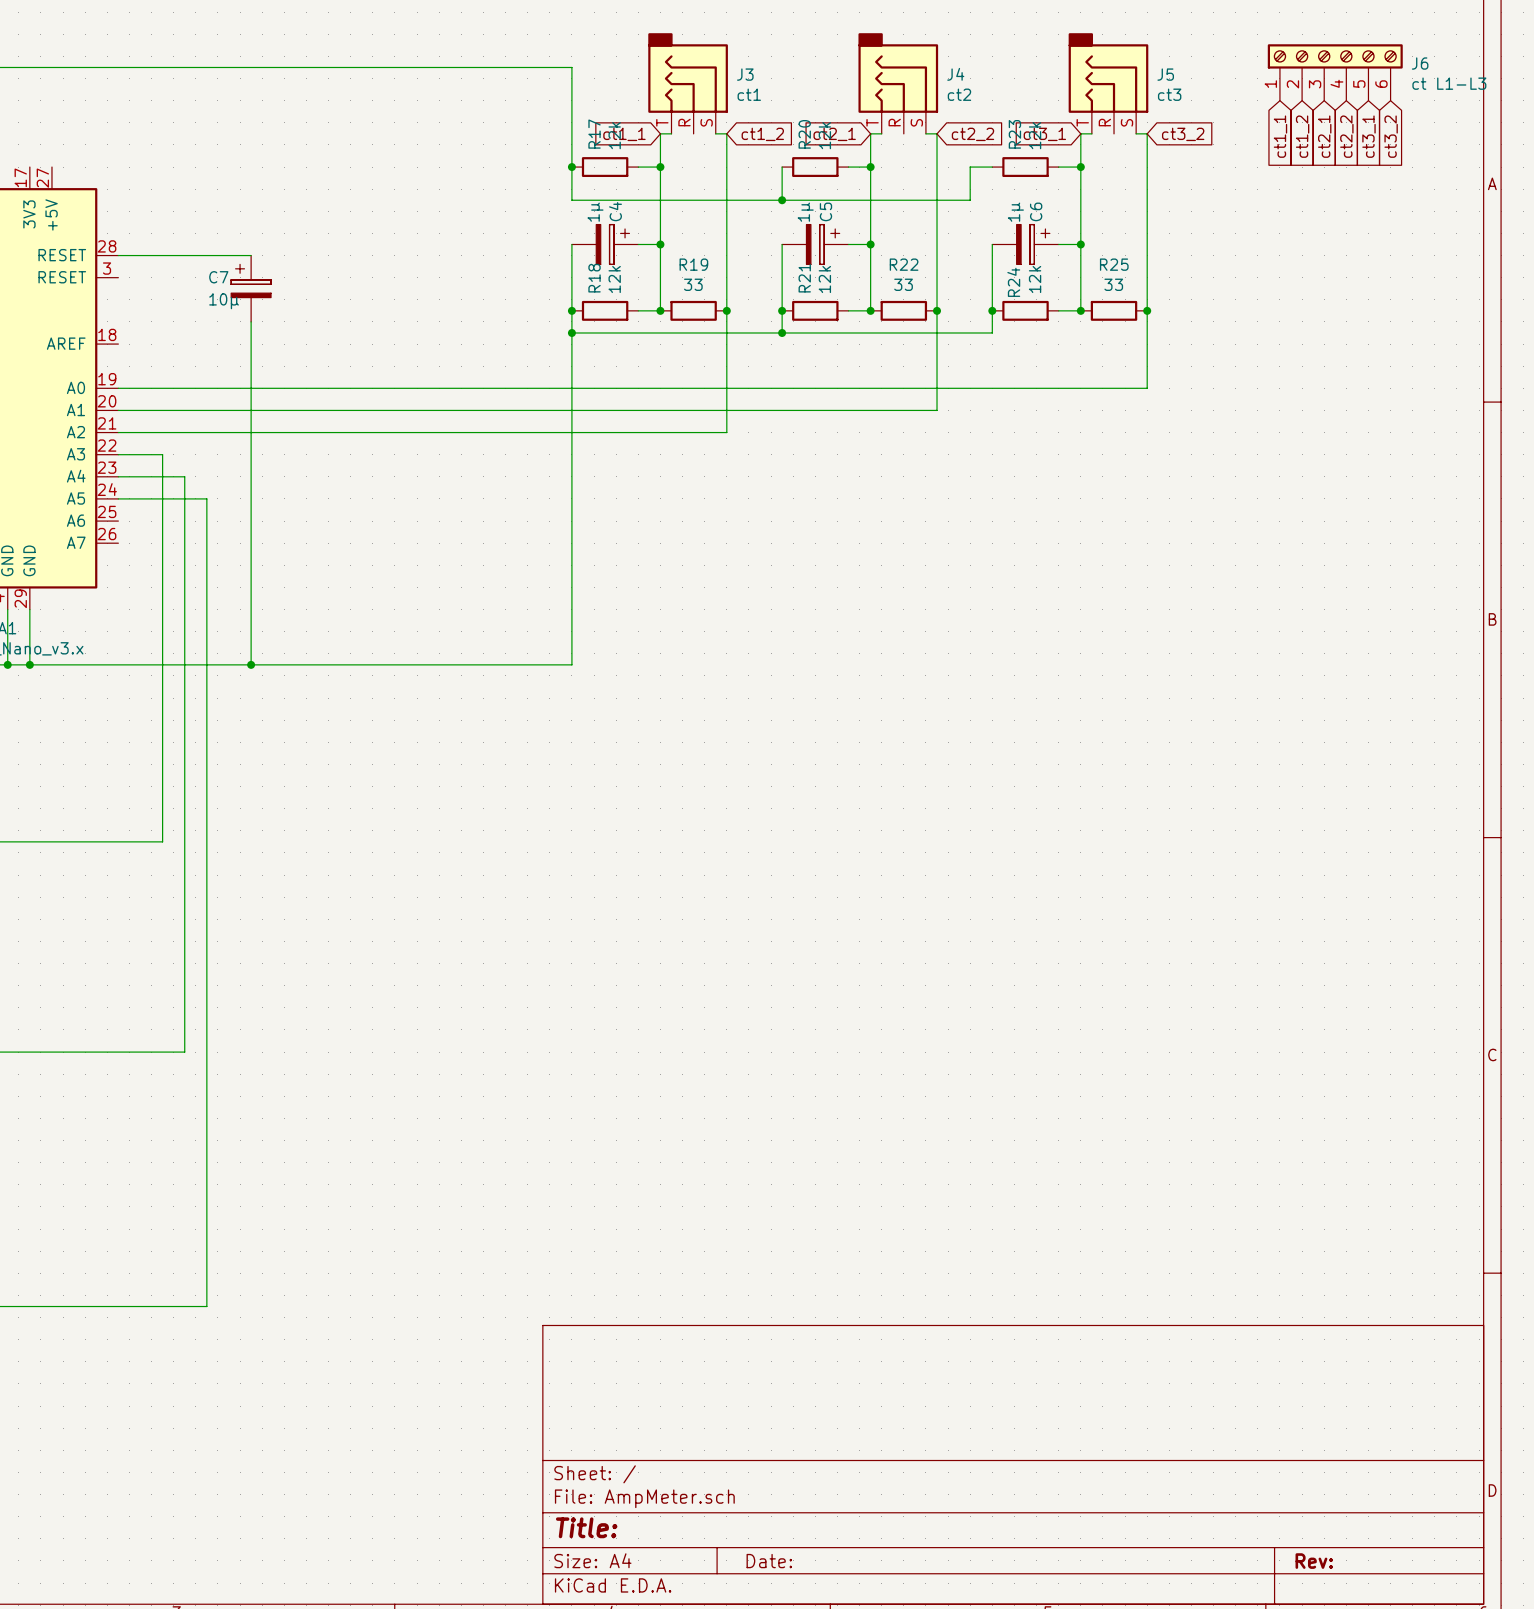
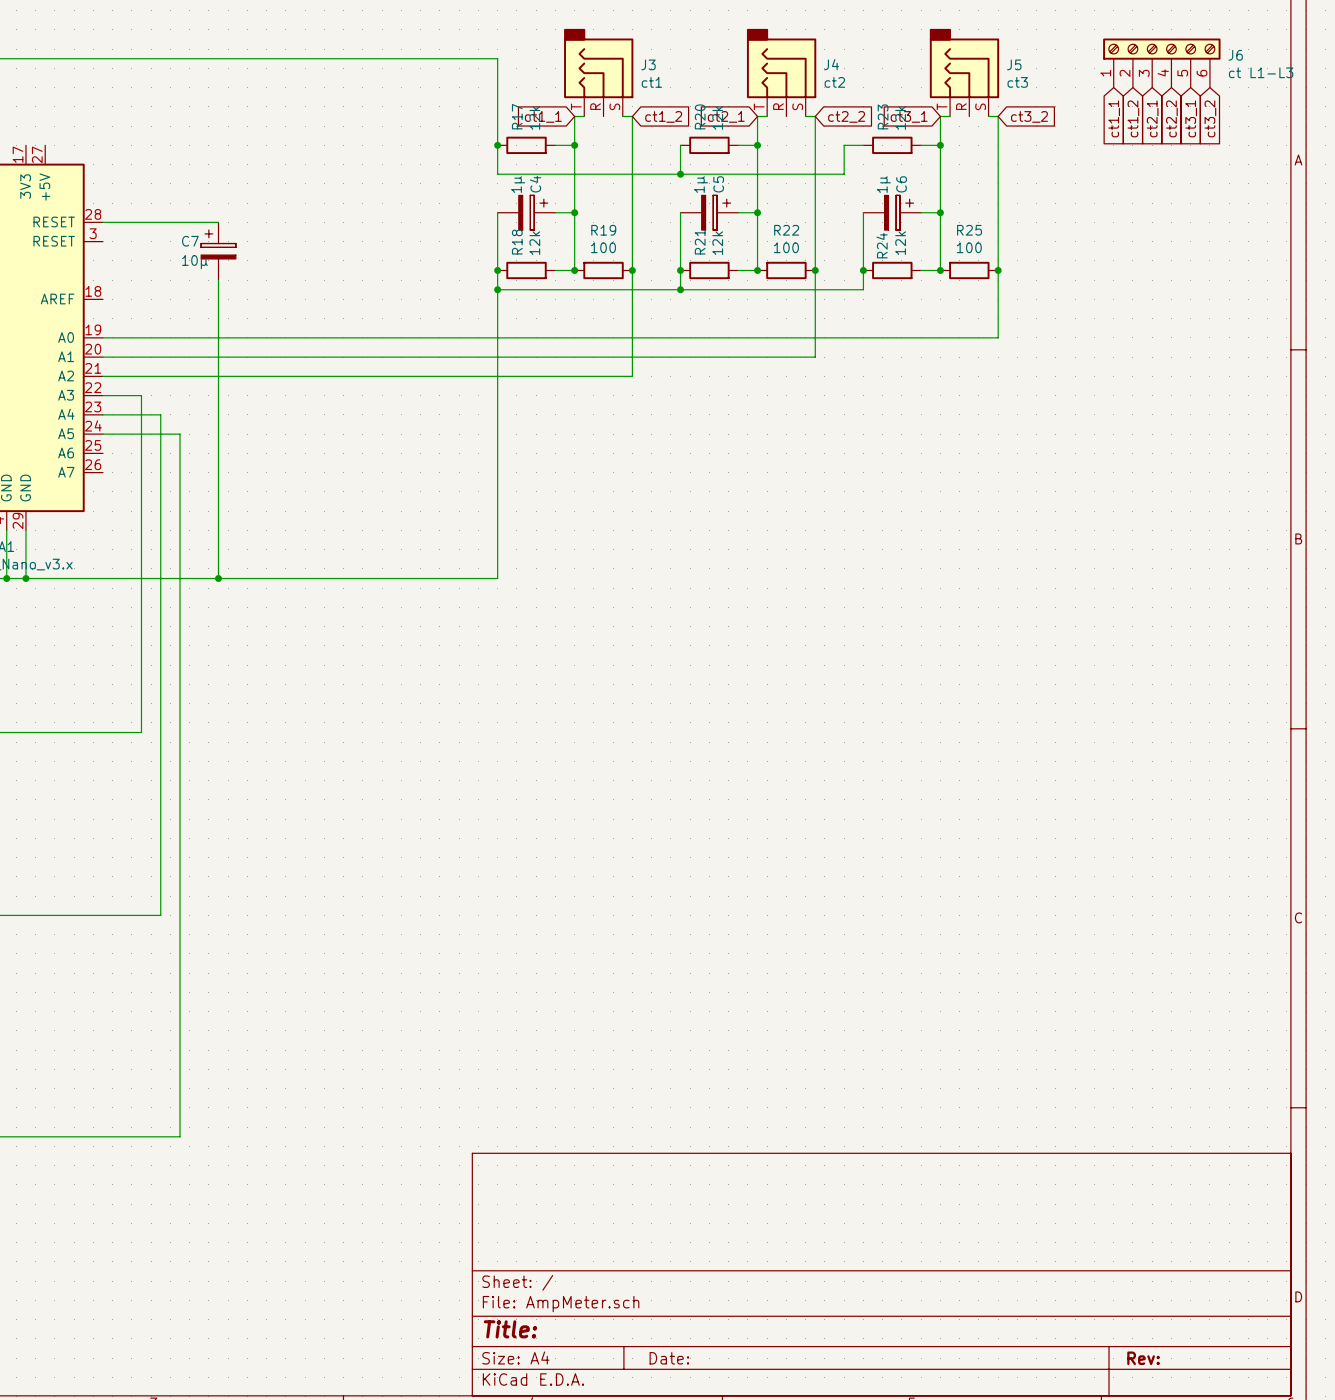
R19 value: 33 (693, 284) -> 100 (603, 247)
R22 value: 33 (903, 284) -> 100 (786, 247)
R25 value: 33 (1113, 284) -> 100 (969, 247)

